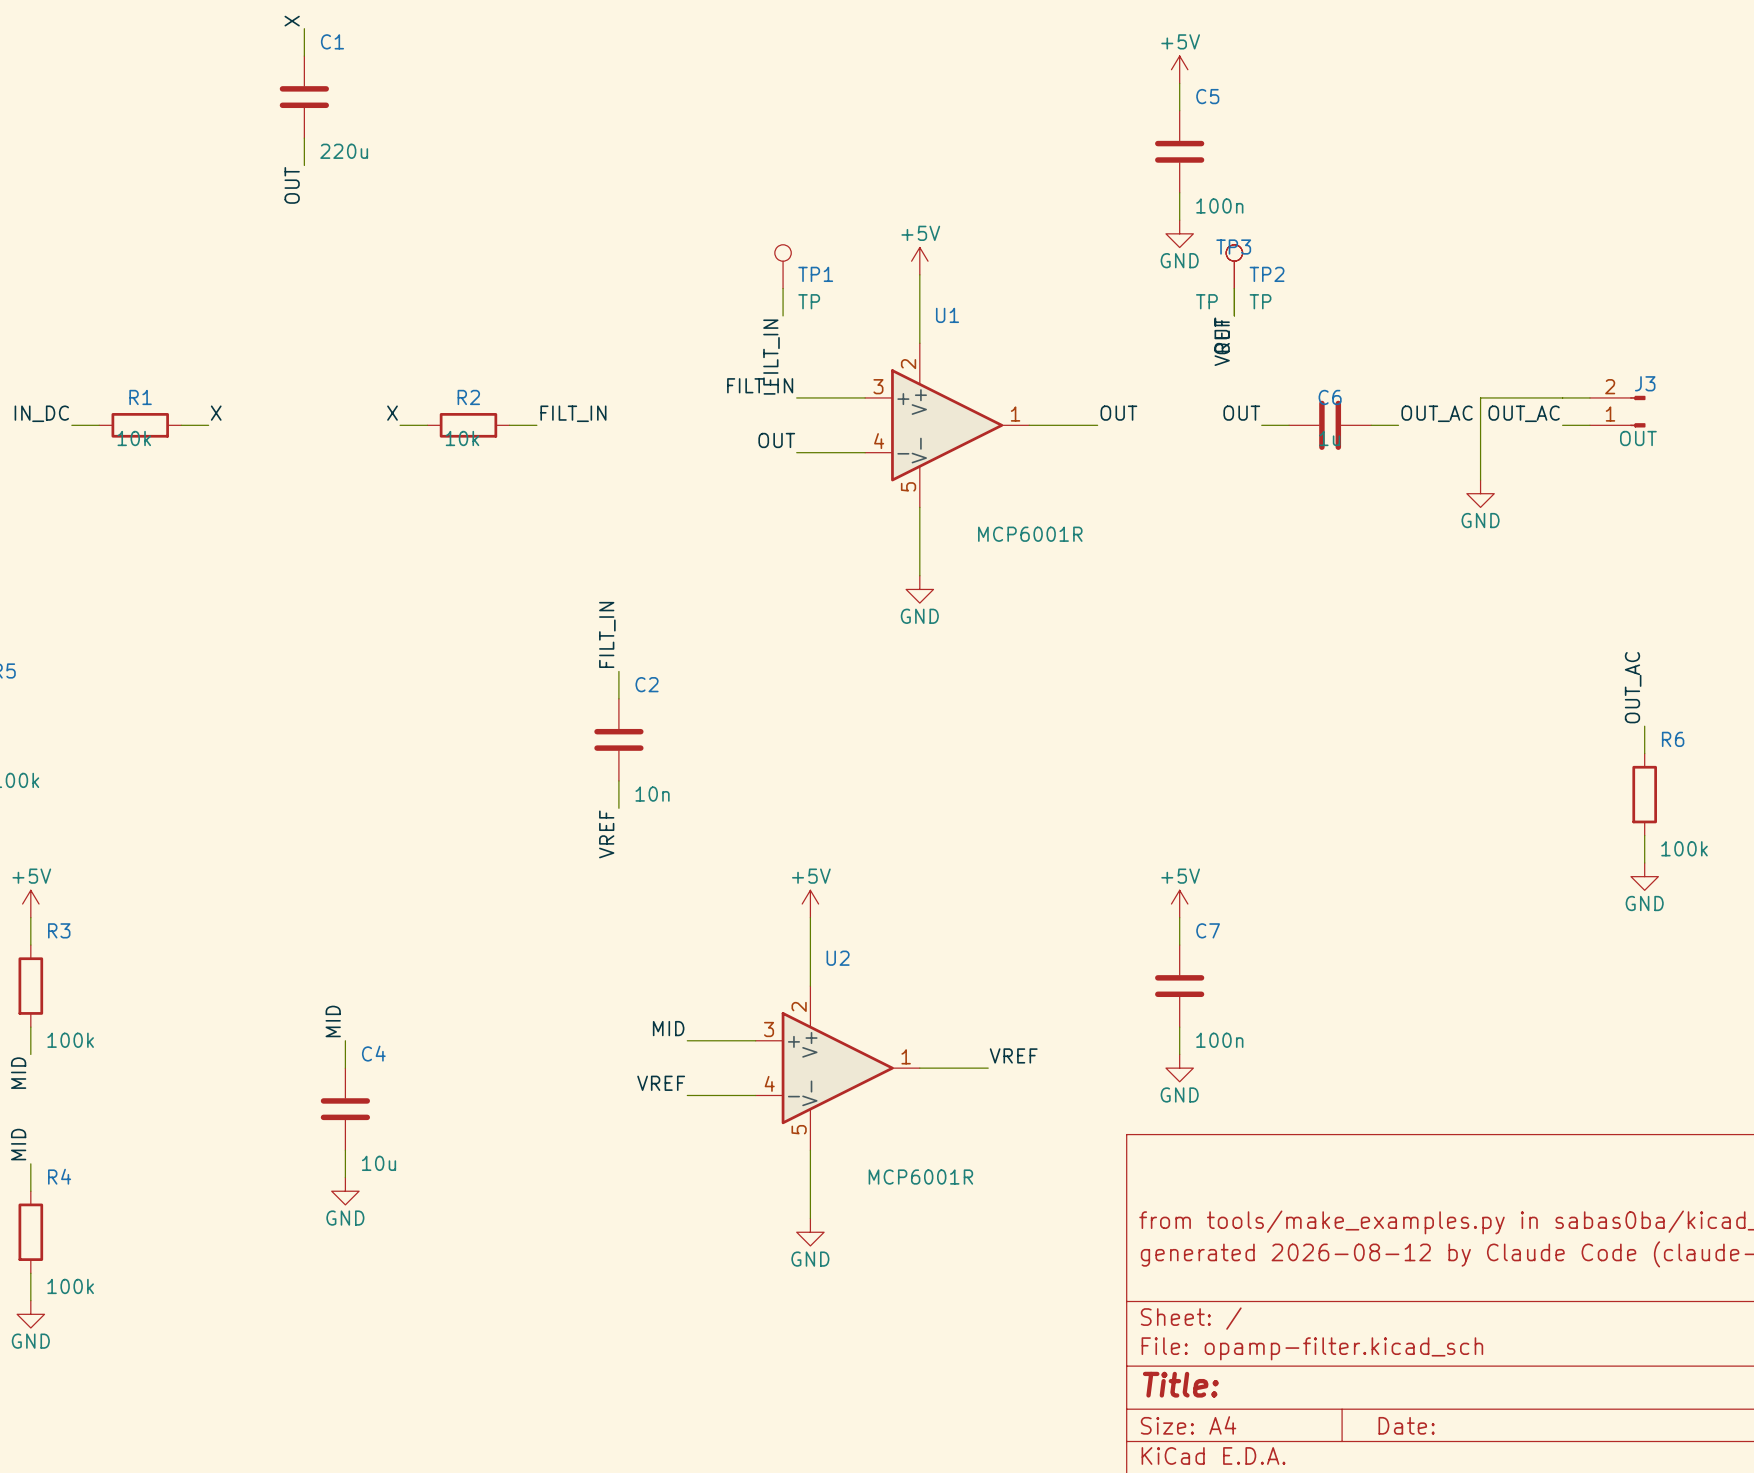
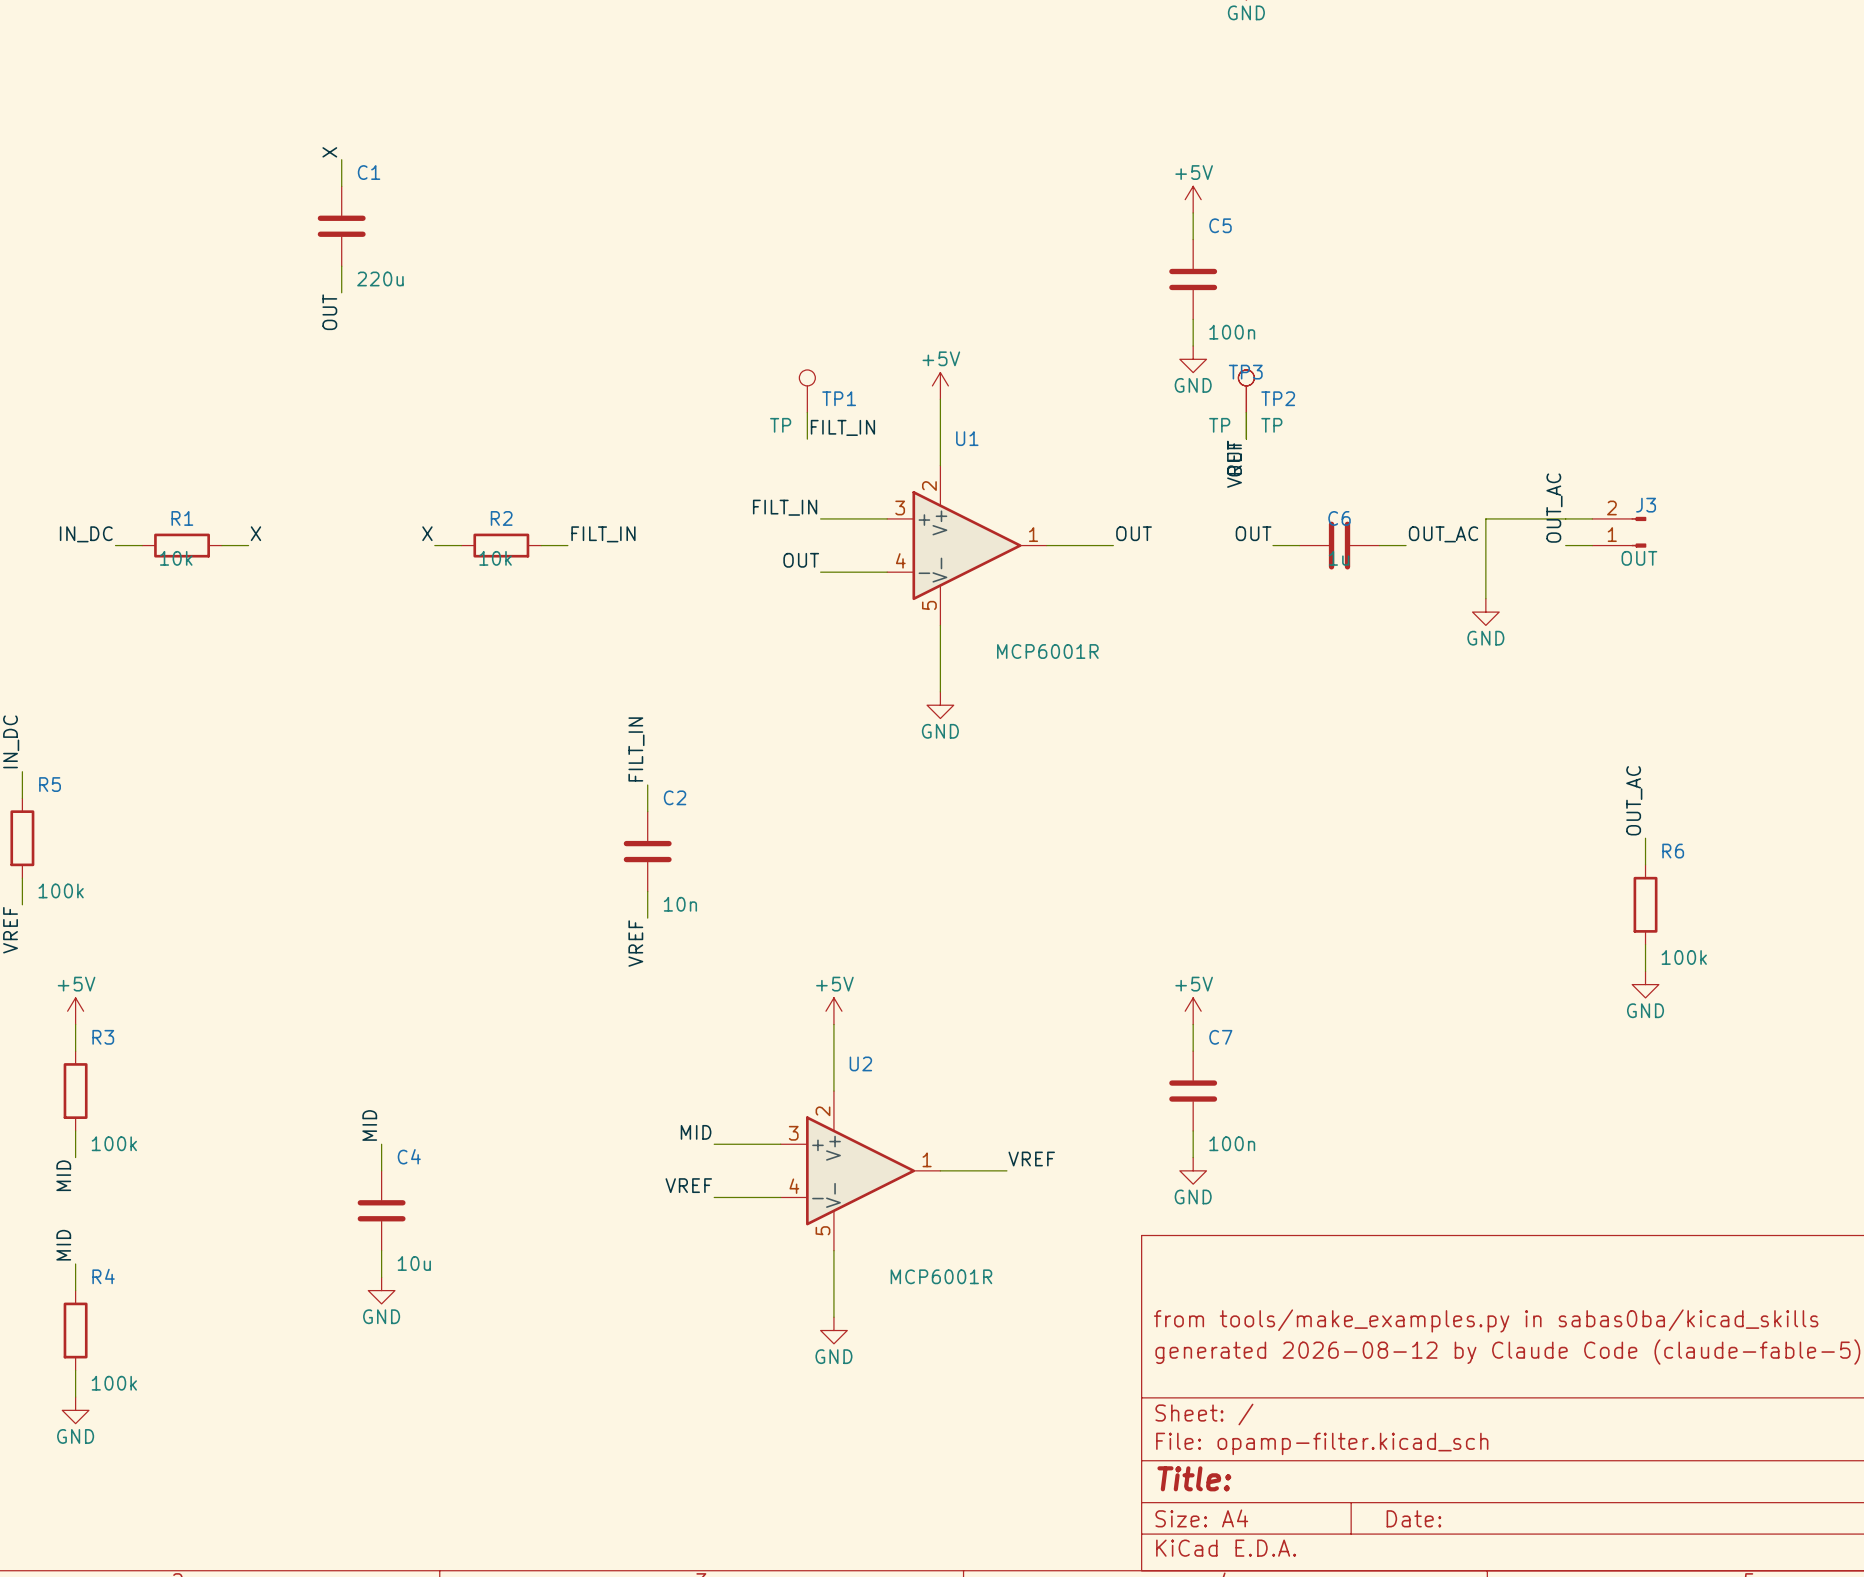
TP1 value position: TP (809, 301) -> TP (780, 425)
label rotation: 0° (771, 352) -> 90° clockwise (842, 427)
label rotation: 0° (1524, 413) -> 90° counterclockwise (1554, 508)

